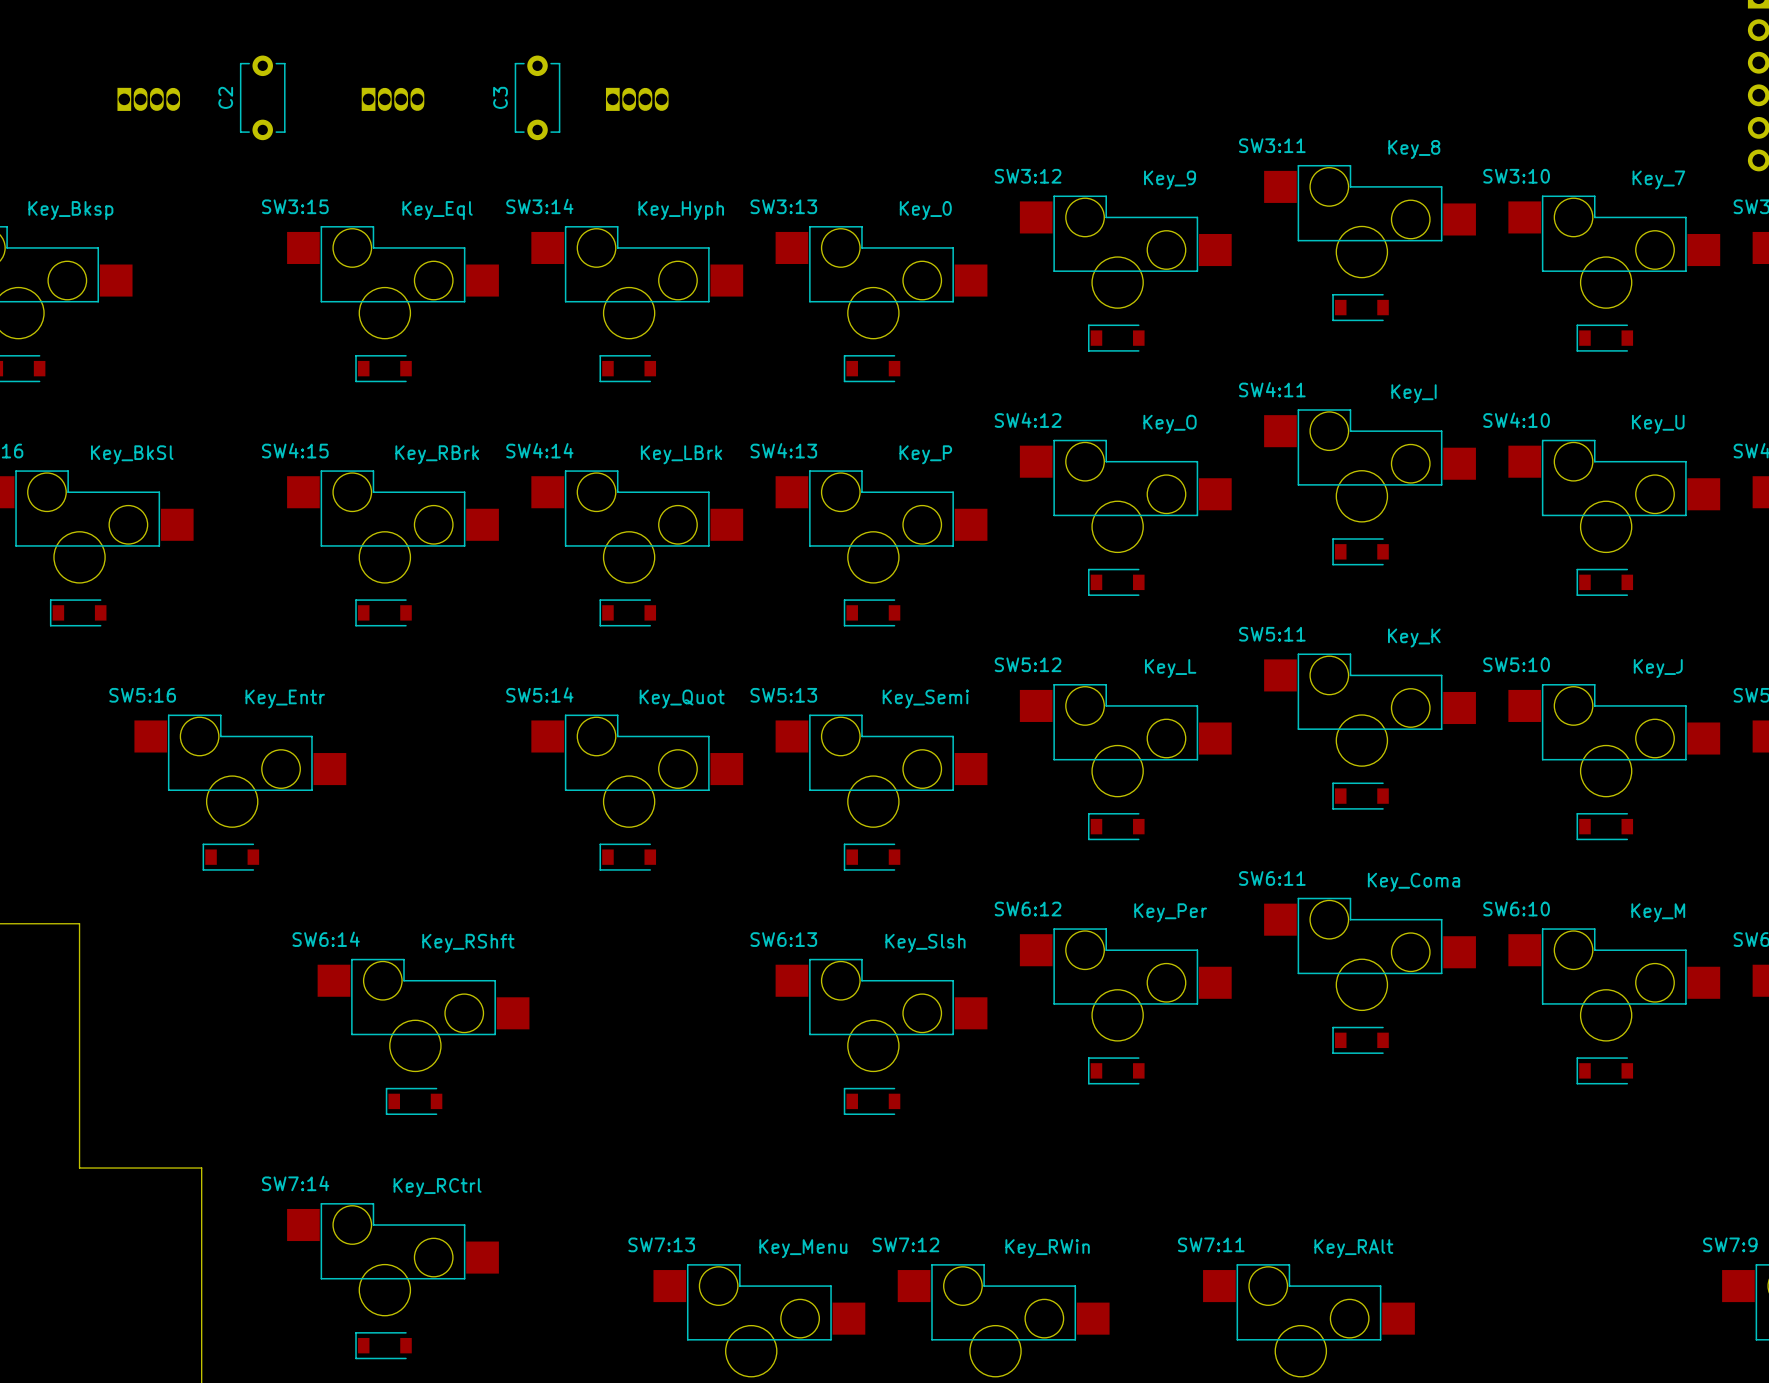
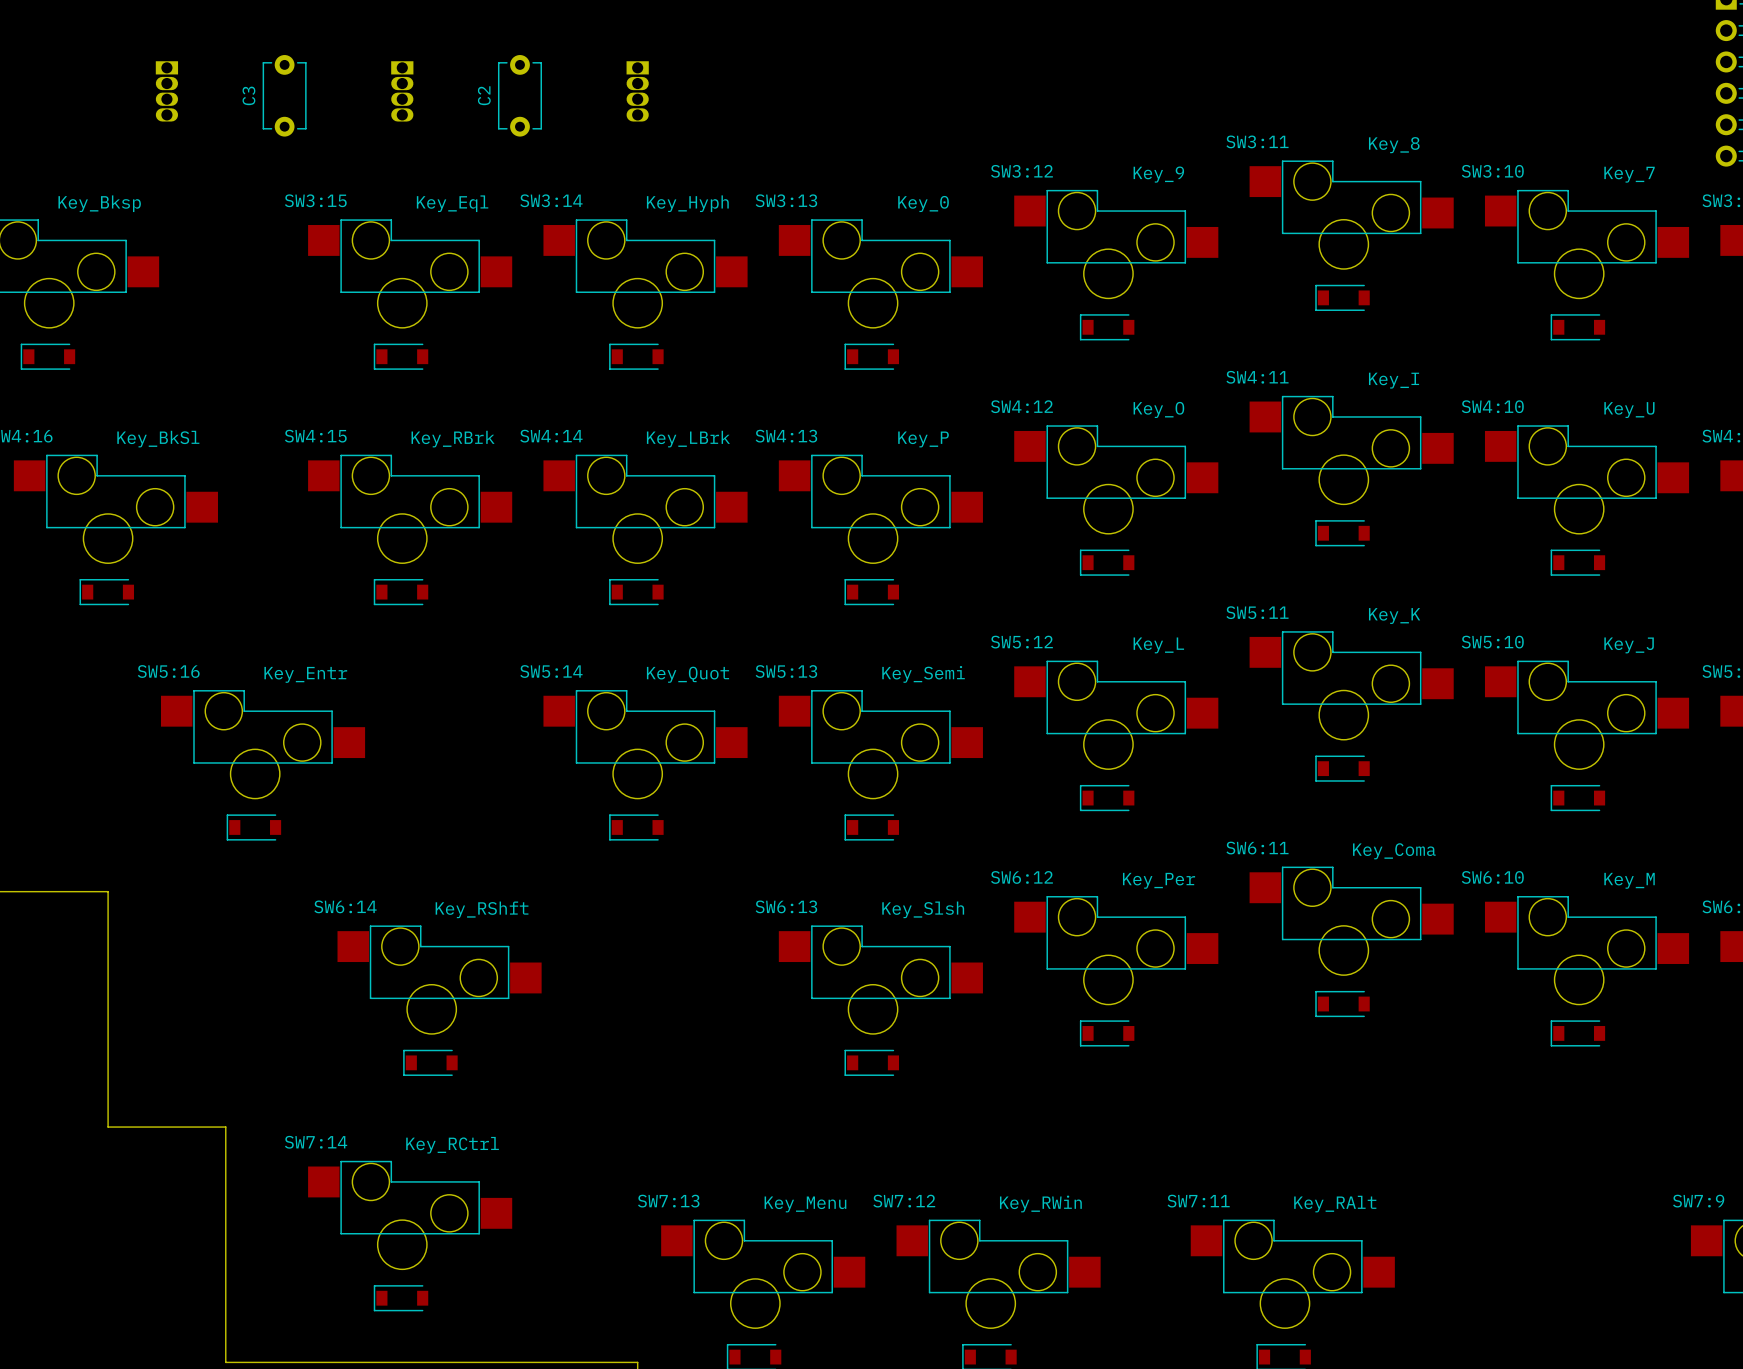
C2 name: C2 (225, 97) -> C3 (248, 95)
C2: none -> (519, 95)
C3: (537, 97) -> none
part rotation: 0° (148, 99) -> 90° clockwise (166, 91)
part rotation: 0° (393, 99) -> 90° clockwise (402, 91)
part rotation: 0° (637, 99) -> 90° clockwise (637, 91)

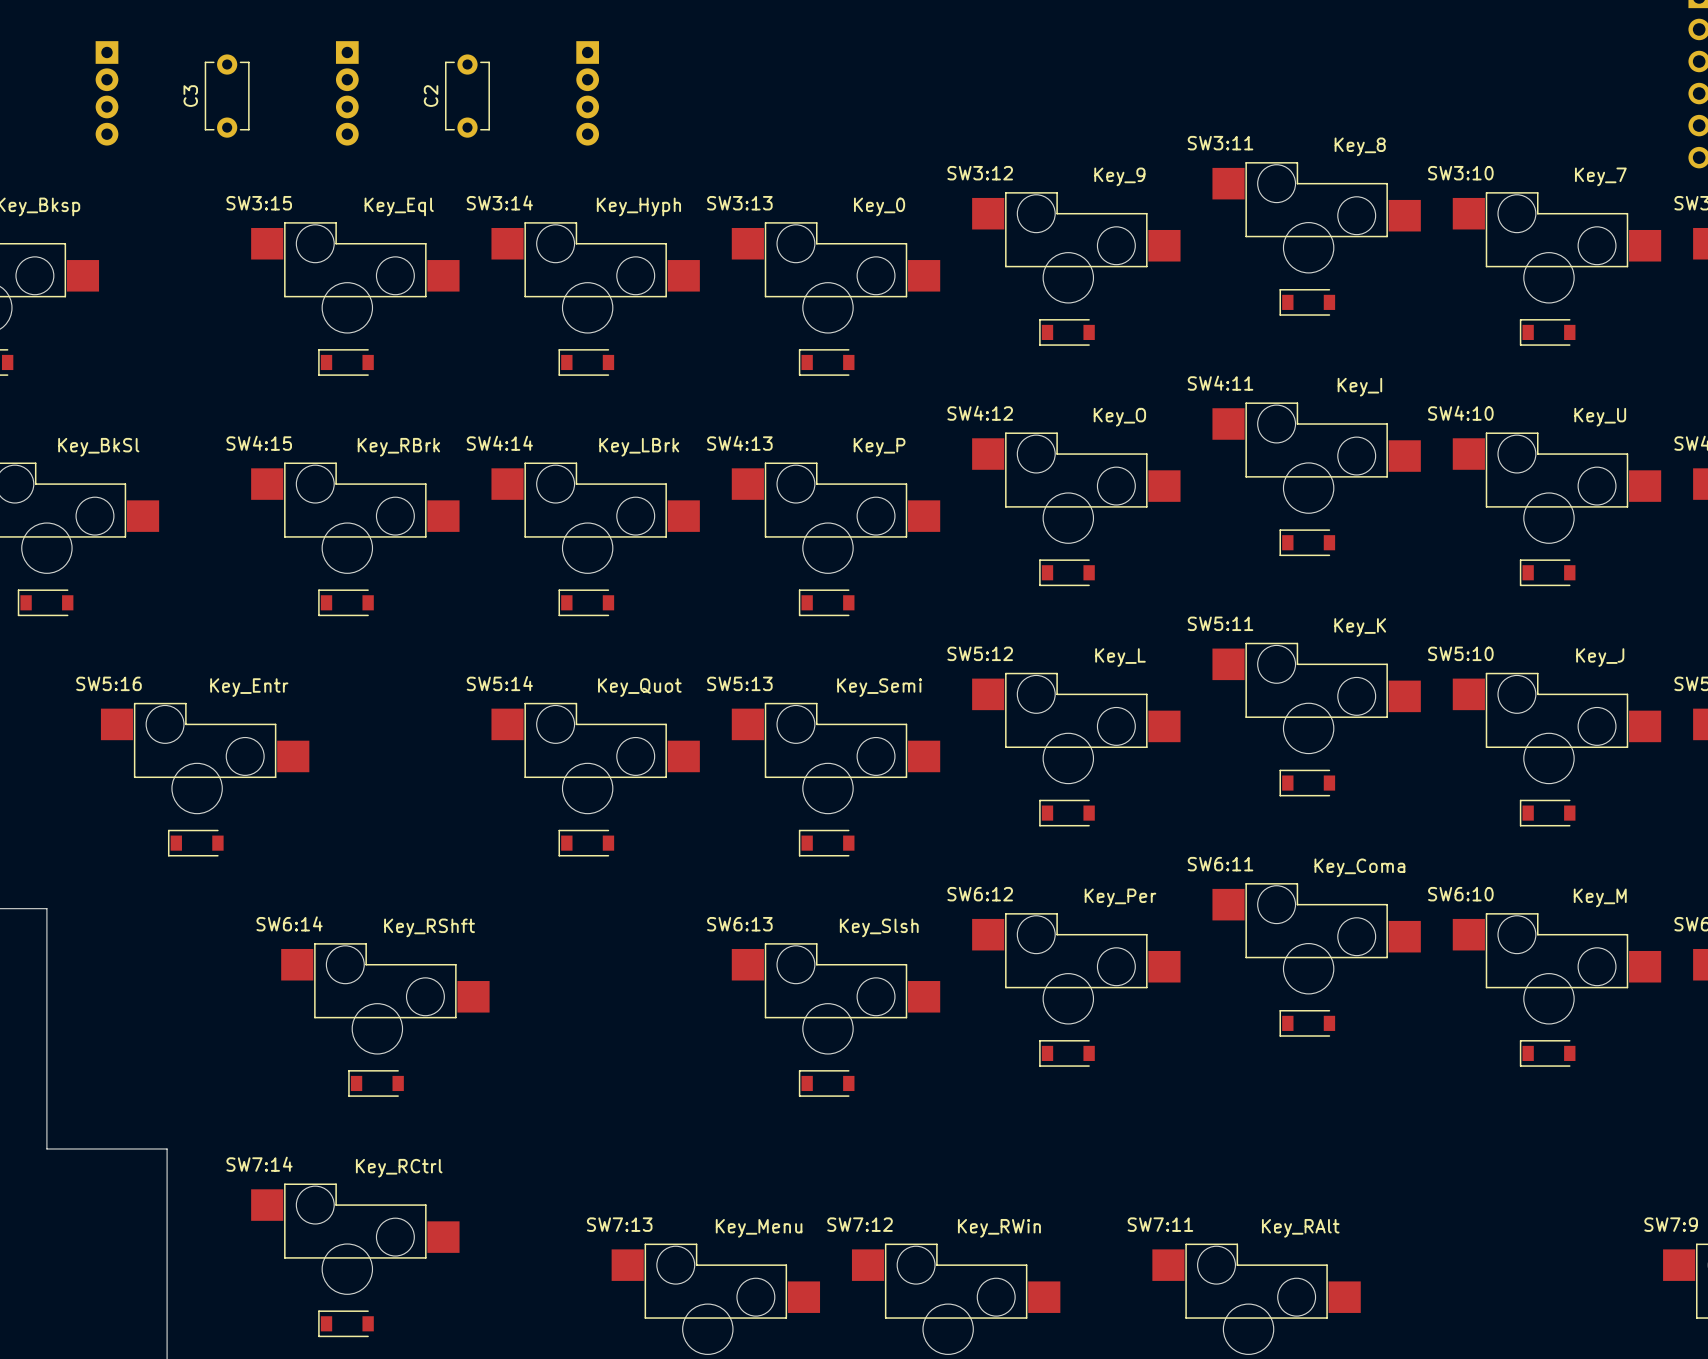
part footprint: [155, 61, 179, 122] -> [95, 41, 119, 146]
part footprint: [391, 61, 414, 122] -> [335, 41, 359, 146]
part footprint: [626, 61, 649, 122] -> [576, 41, 600, 146]

